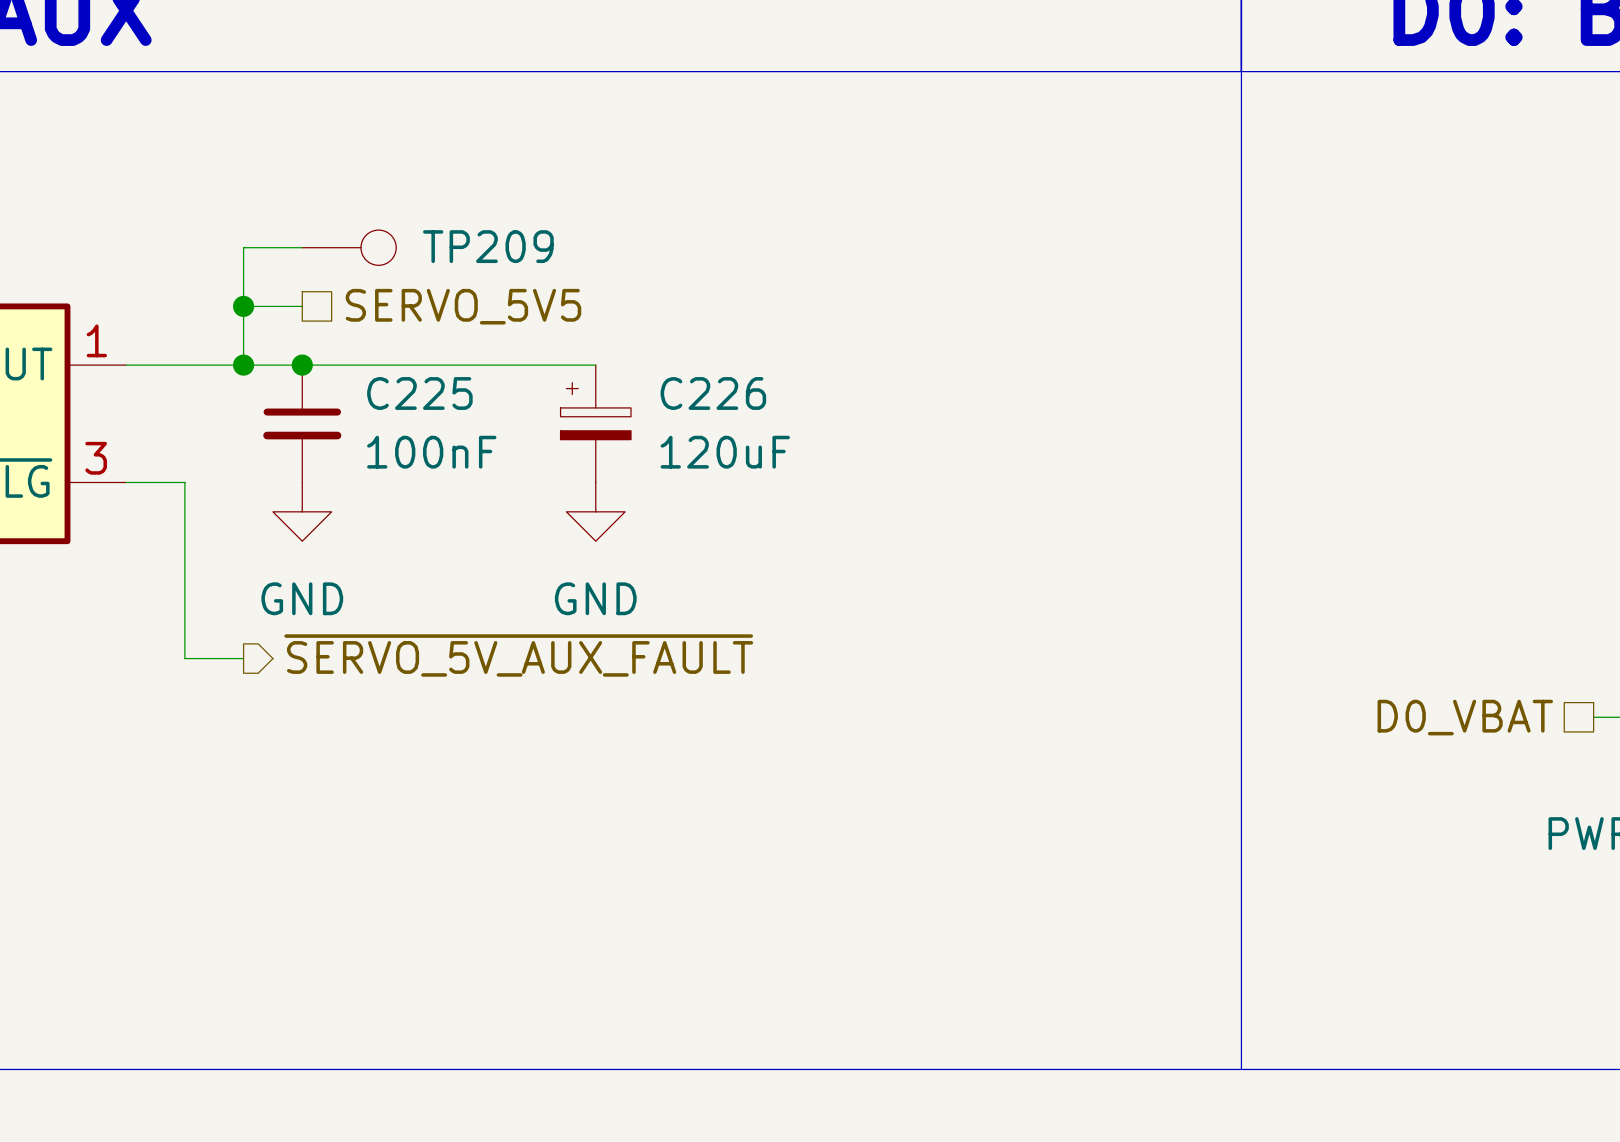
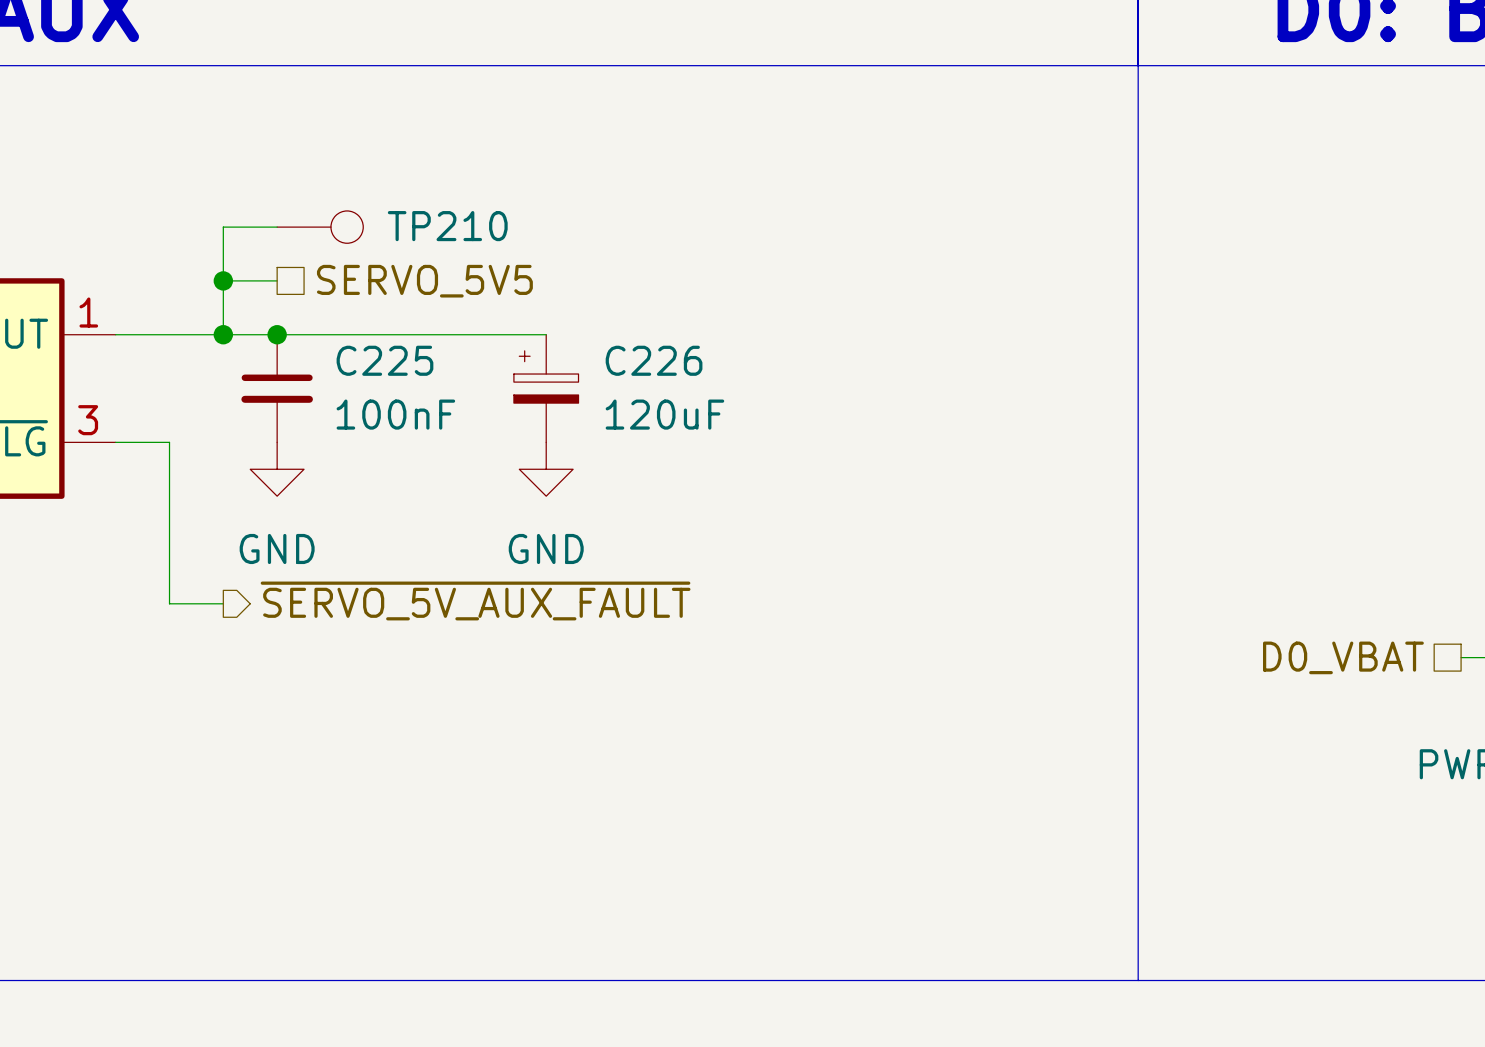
TP209 name: TP209 (488, 246) -> TP210 (447, 226)

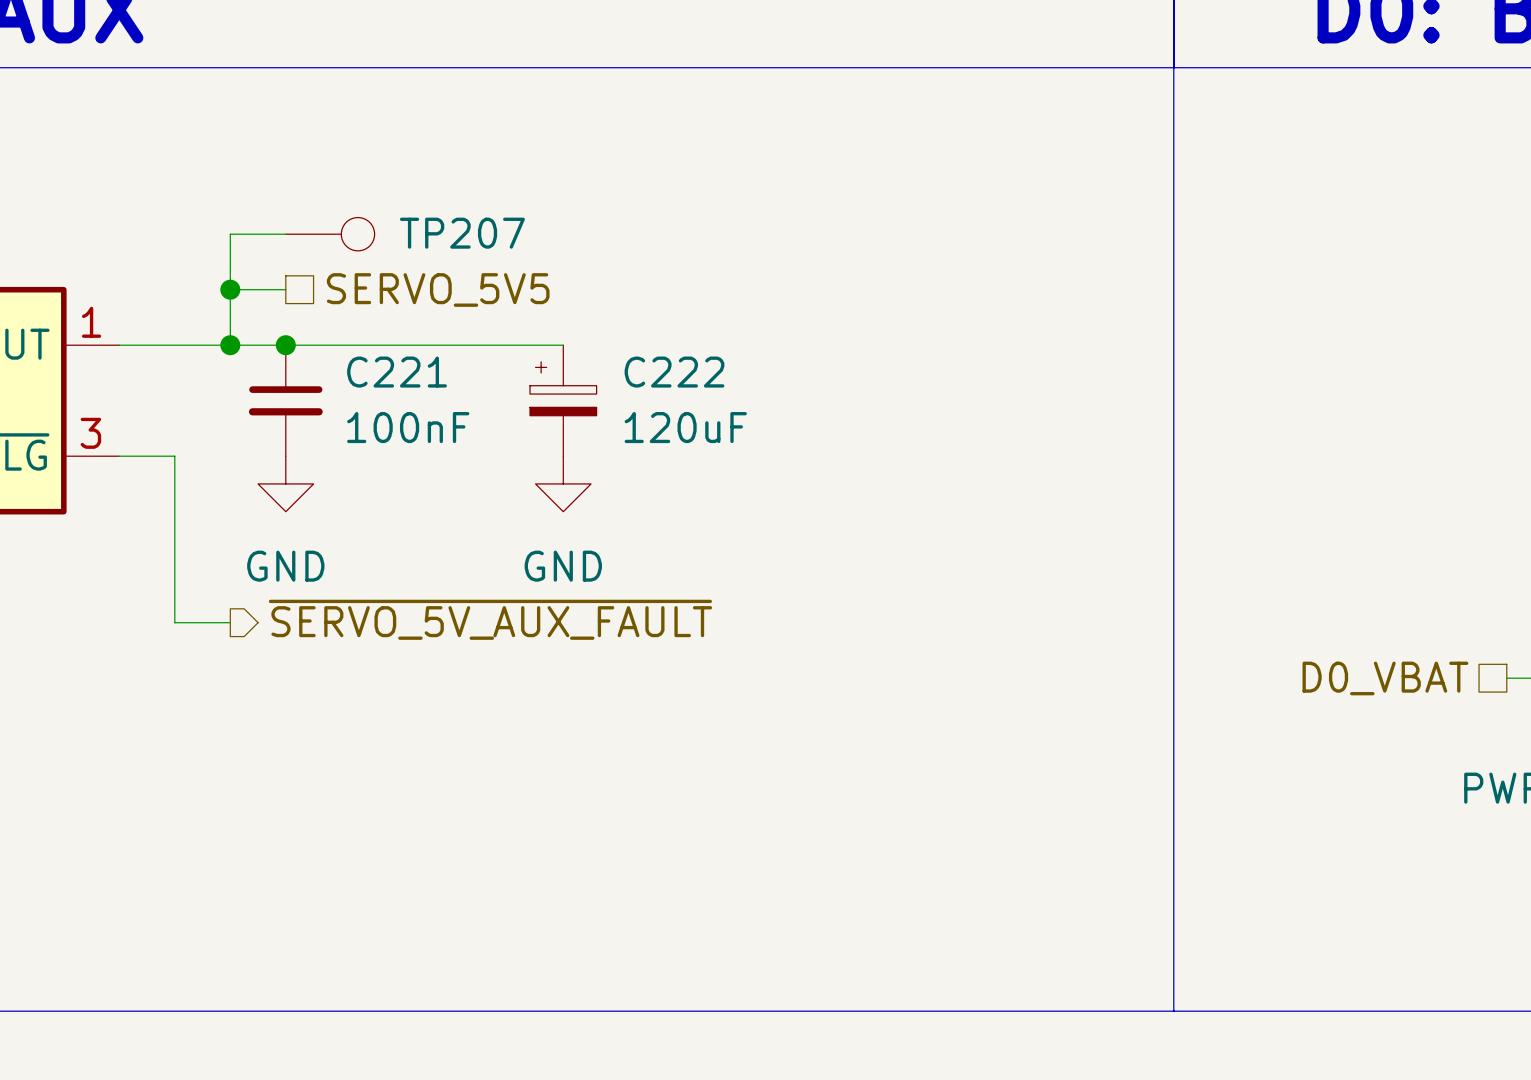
TP210 name: TP210 (447, 226) -> TP207 (462, 233)
C225 name: C225 (384, 360) -> C221 (397, 372)
C226 name: C226 (654, 360) -> C222 (674, 372)

